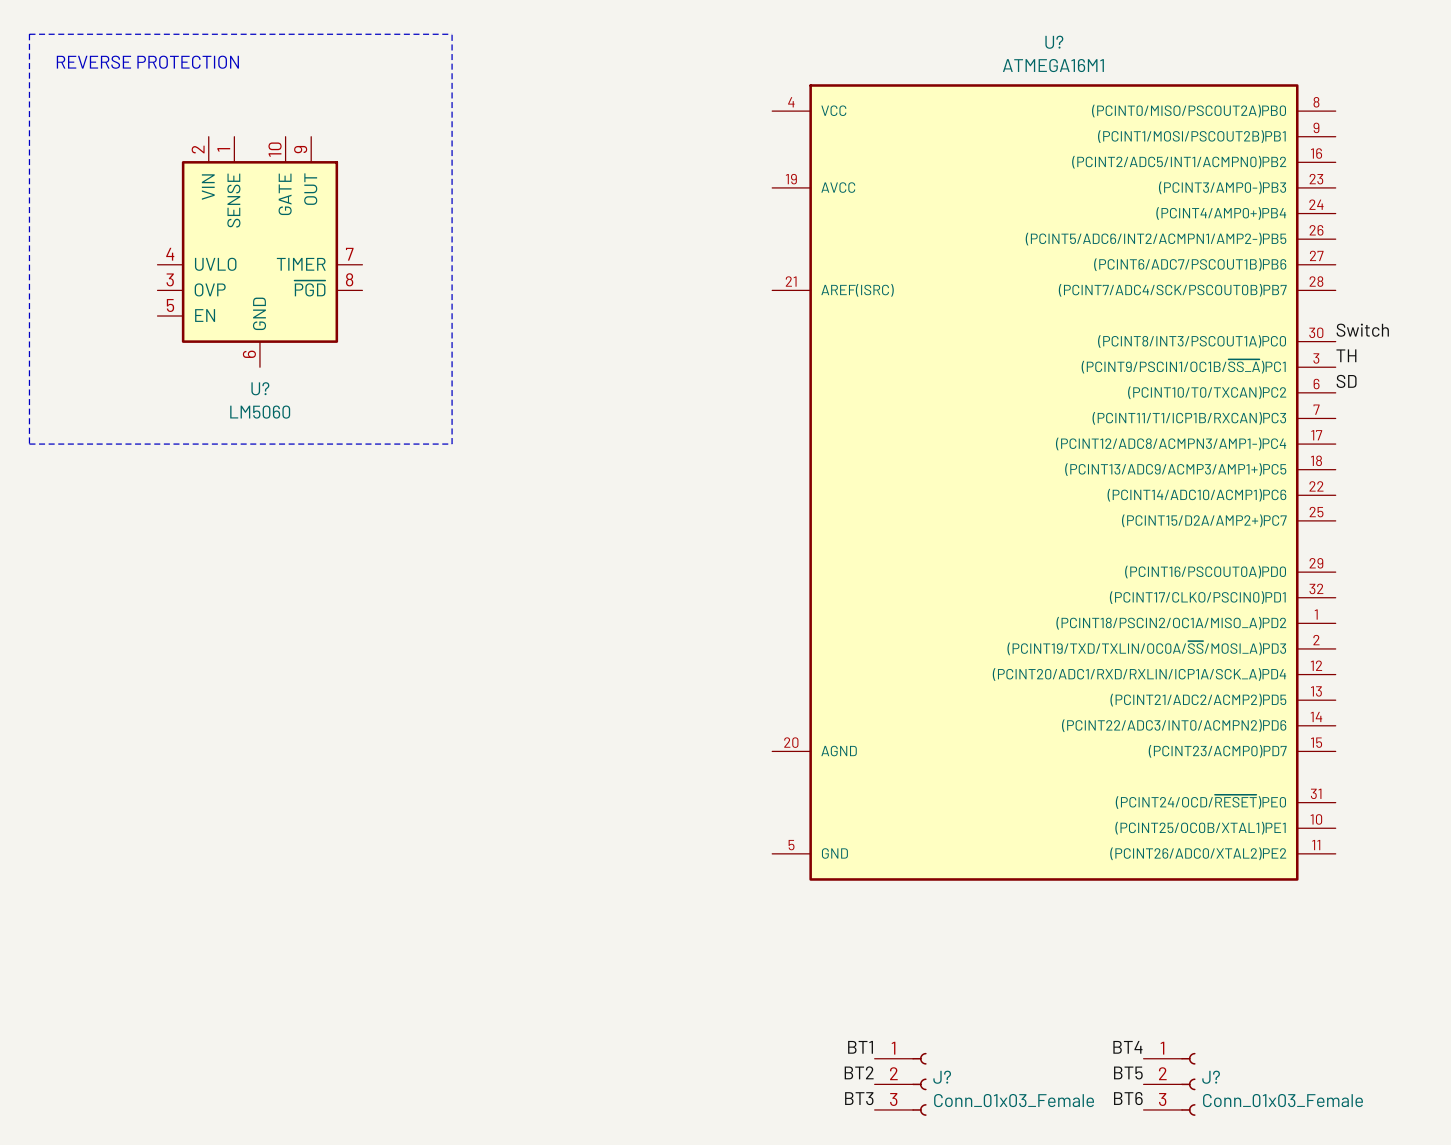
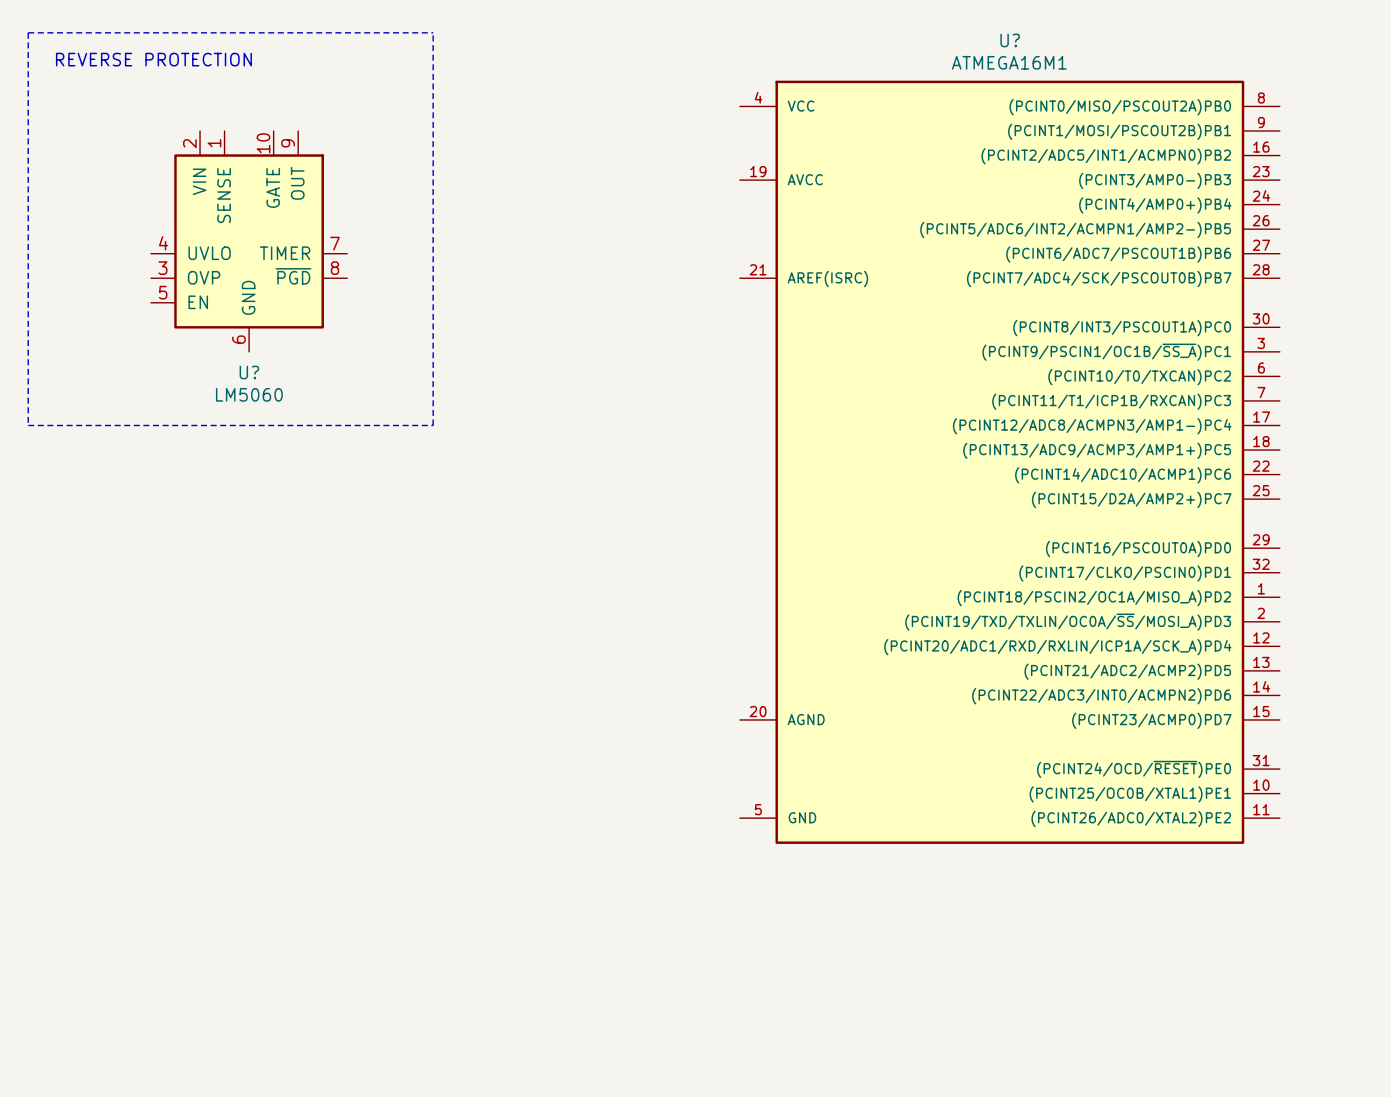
label: Switch (1362, 330) -> none
label: TH (1346, 355) -> none
label: SD (1346, 381) -> none
label: BT1 (860, 1047) -> none
label: BT4 (1127, 1047) -> none
label: BT2 (859, 1072) -> none
label: BT5 (1128, 1073) -> none
J?: Conn_01x03_Female (900, 1084) -> none
J?: Conn_01x03_Female (1169, 1084) -> none
label: BT3 (859, 1098) -> none
label: BT6 (1128, 1098) -> none

